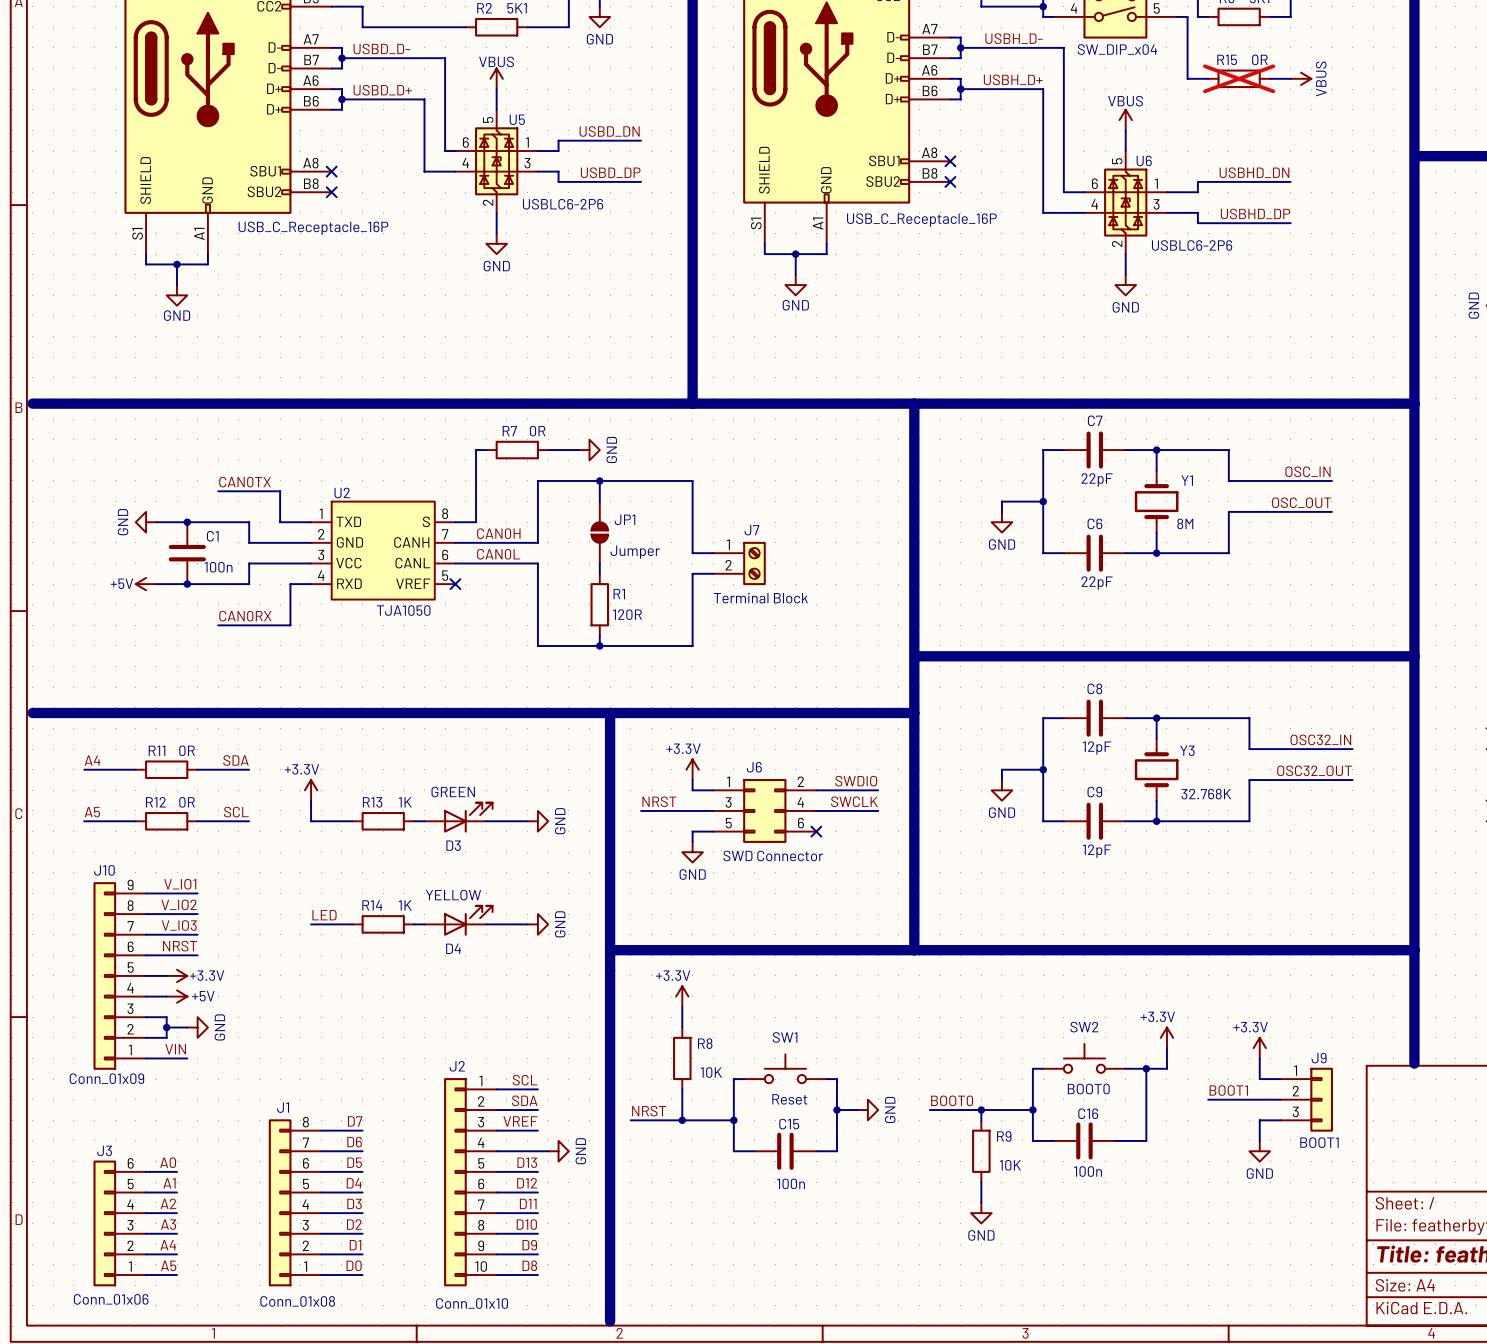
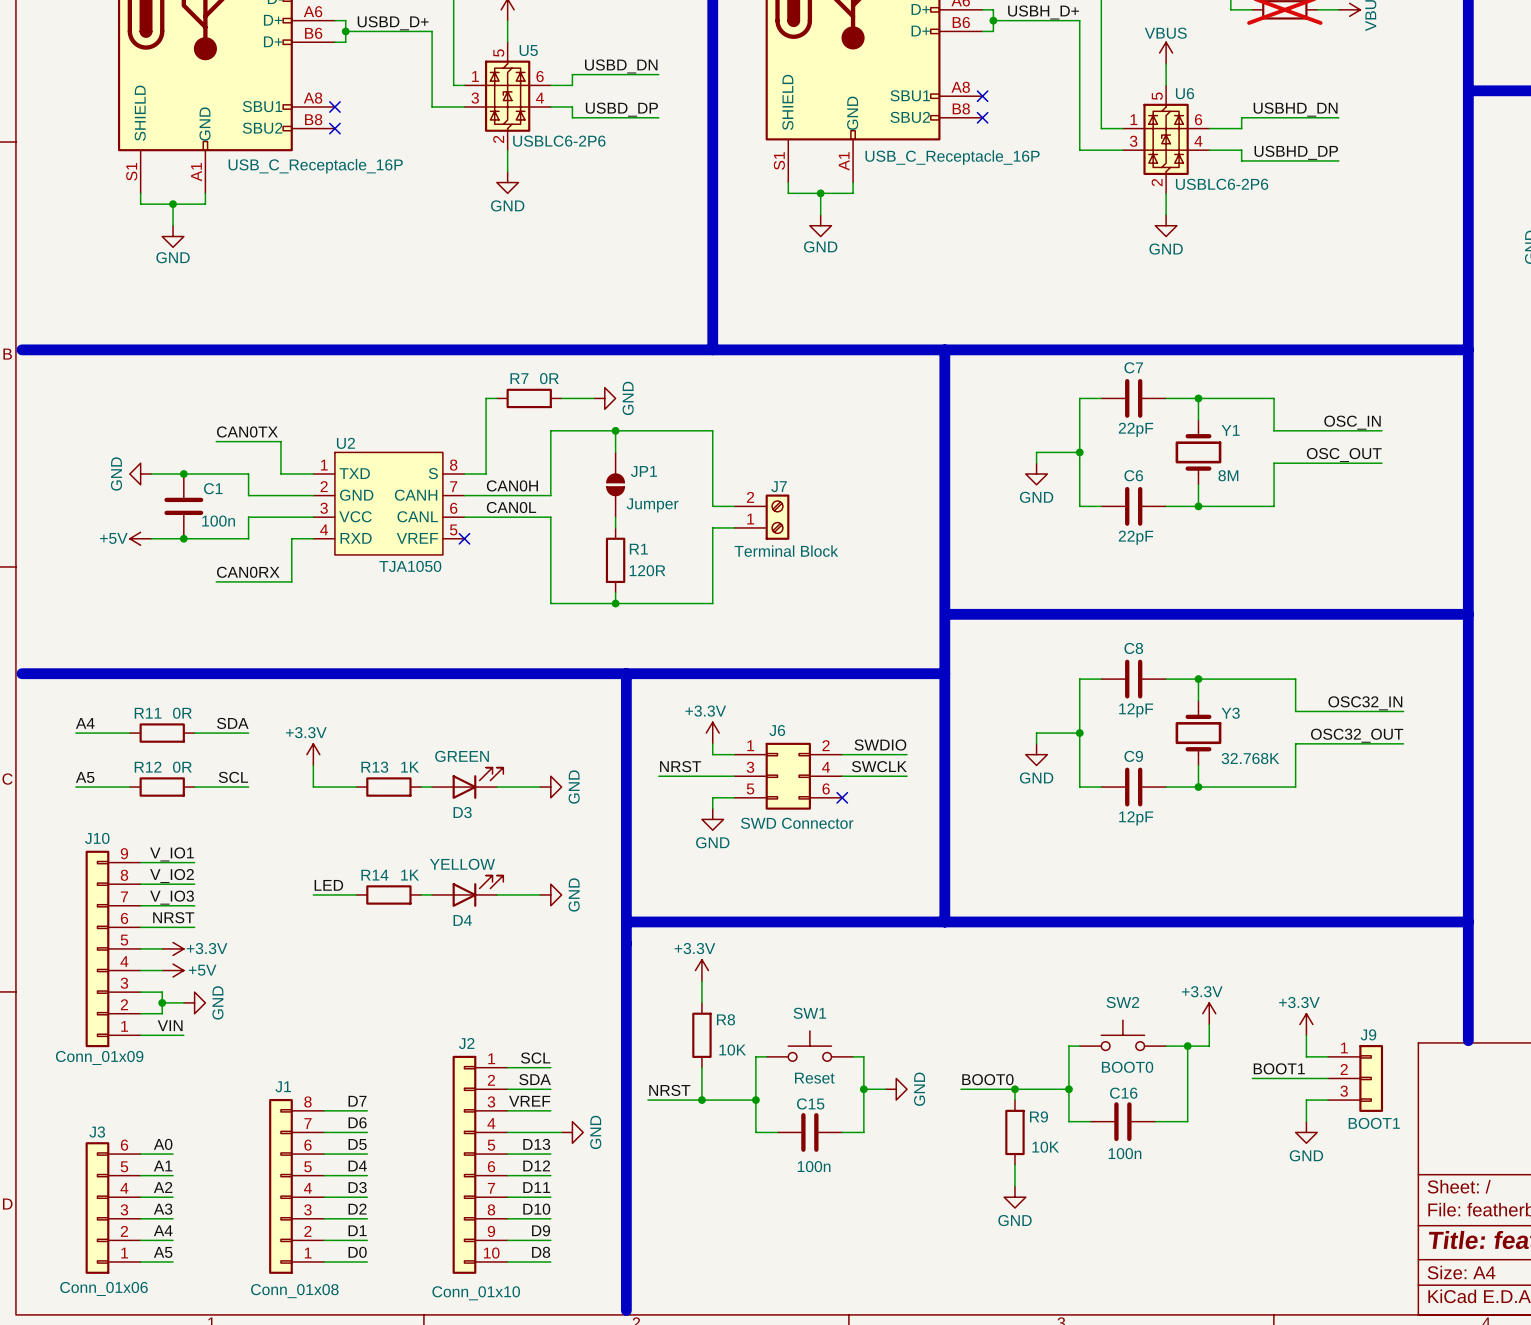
U5 flip: as is (496, 161) -> left-right (507, 96)
U6 flip: as is (1125, 202) -> left-right (1166, 139)
J7 flip: as is (754, 563) -> up-down (777, 517)

